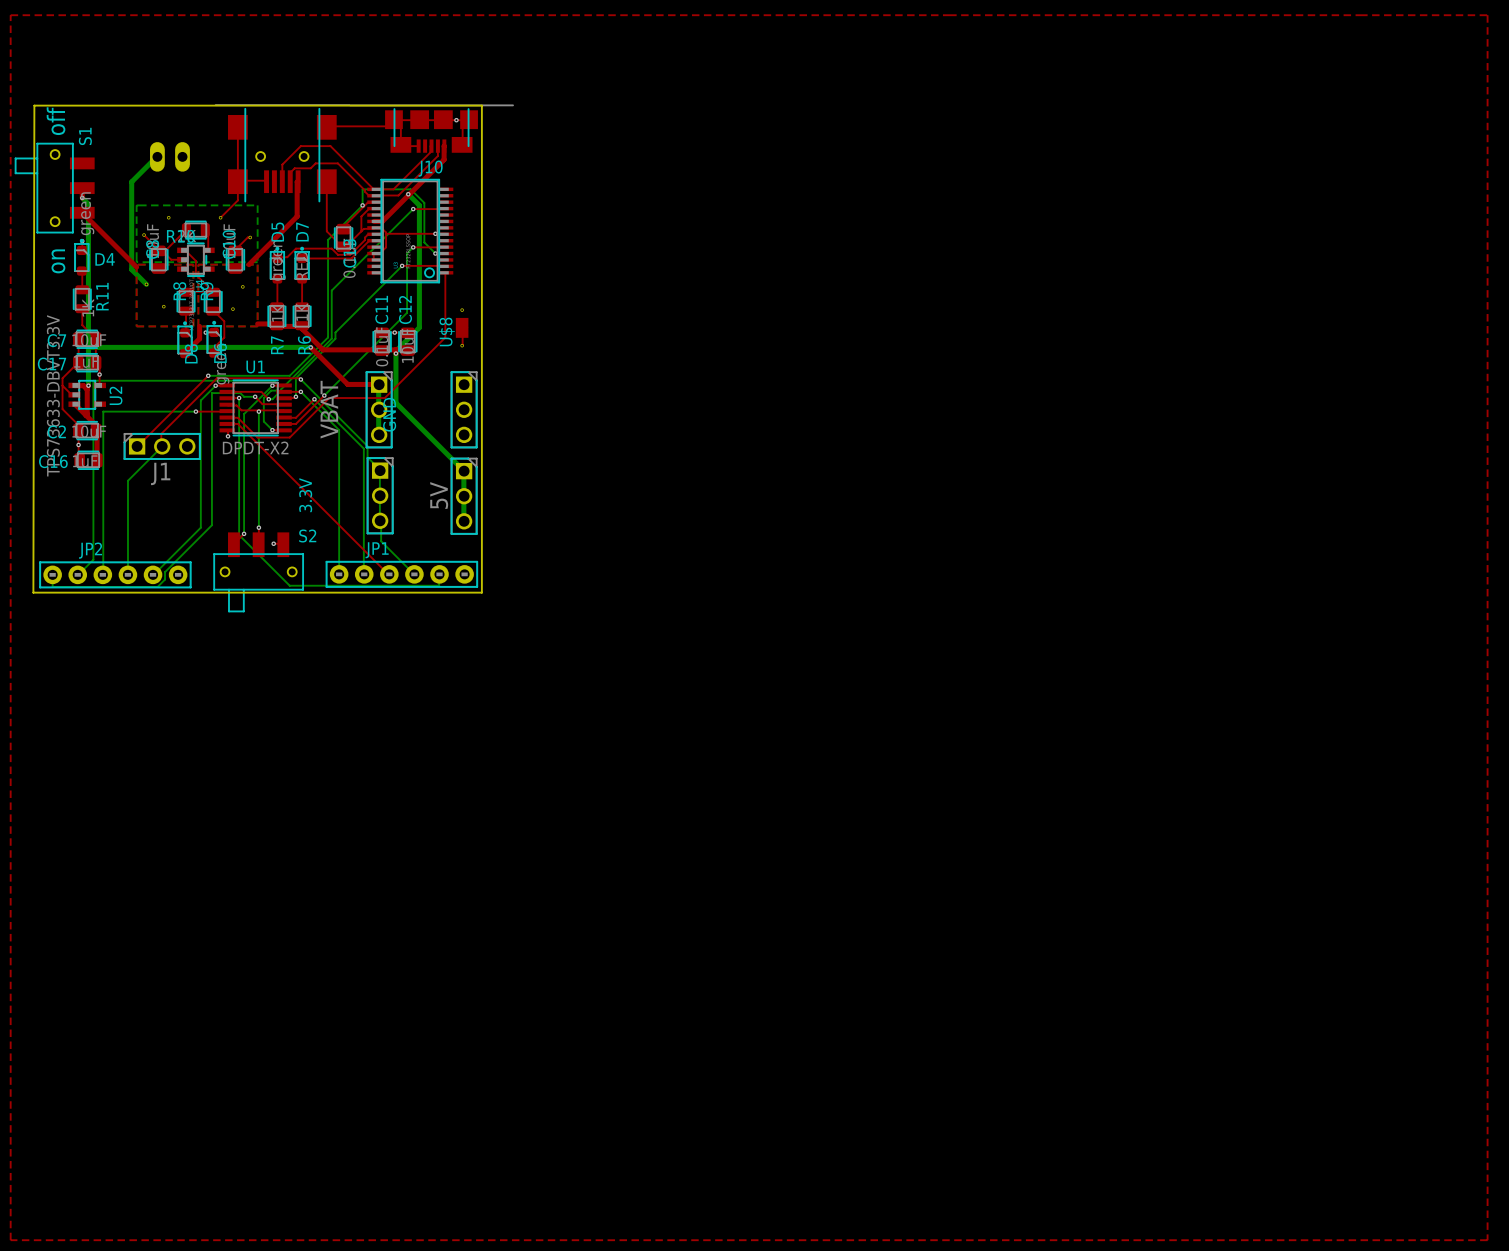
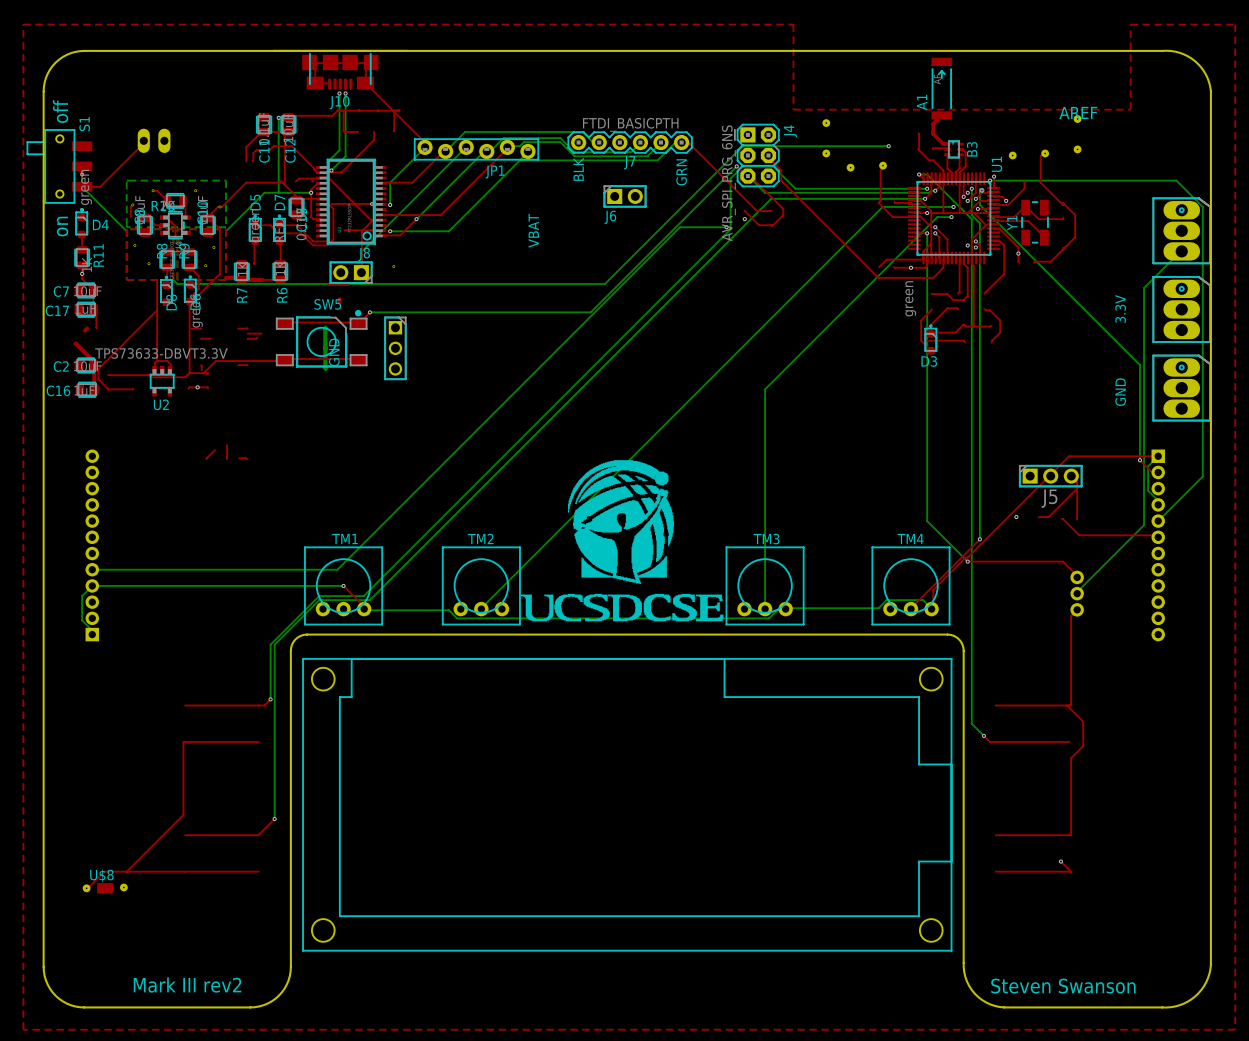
top zone outline: (949, 15) (1360, 15) -> (793, 24) (793, 109) (1130, 109) (1130, 24)
board edge: none -> (84, 50) (1166, 50) (1183, 54) (1194, 61) (1205, 74) (1210, 91) (1210, 964) (1208, 978) (1201, 989) (1188, 1001) (1166, 1007) (1004, 1007) (985, 1002) (971, 989) (965, 977) (963, 967) (963, 650) (961, 642) (953, 635) (307, 634) (295, 639) (290, 650) (290, 966) (288, 980) (284, 988) (271, 1001) (263, 1005) (250, 1007) (84, 1007) (70, 1005) (58, 998) (47, 984) (43, 966) (43, 91) (45, 78) (55, 62) (70, 53) (84, 50)
top track: none -> (329, 84) (315, 83) (315, 63) (309, 62) (371, 62) (365, 63) (365, 83) (424, 142) (425, 147)
A1: none -> (941, 88)
bottom track: none -> (339, 93) (339, 150) (327, 162)
via: none -> (339, 93)
bottom track: none -> (345, 93) (345, 156) (331, 170)
via: none -> (345, 93)
board edge: (34, 105) (33, 592) (481, 592) (481, 105) (34, 105) -> none
via: (456, 120) -> none
text: none -> AREF (1078, 112)
top track: none -> (941, 115) (933, 123) (932, 133) (943, 144) (947, 144)
top track: (237, 127) (237, 200) (220, 217) -> none
bottom track: none -> (278, 117) (278, 192)
via: none -> (278, 117)
J10 position: (431, 128) -> (340, 69)
part: none -> (1077, 119)
part: none -> (826, 123)
top track: (330, 146) (373, 189) (393, 189) (430, 152) (431, 146) -> (285, 131) (288, 131) (284, 131) (284, 184) (281, 181)
top track: (444, 146) (444, 159) (382, 221) (374, 221) -> none
top track: none -> (918, 133) (918, 149) (943, 170) (943, 213)
part: (282, 153) -> none
bottom track: (157, 156) (131, 181) (131, 269) (146, 284) -> none
bottom track: none -> (599, 142) (592, 142) (582, 131) (465, 131) (445, 151)
J7: none -> FTDI_BASICPTH (630, 142)
bottom track: none -> (640, 142) (631, 152) (574, 152) (560, 138) (503, 138) (491, 150) (485, 150) (416, 219)
bottom track: none -> (661, 142) (647, 156) (574, 156) (560, 142) (523, 142) (519, 146) (507, 147)
top track: none -> (681, 142) (681, 144) (690, 144) (756, 211) (771, 211)
bottom track: none -> (681, 142) (673, 144) (657, 160) (519, 160)
bottom track: none -> (888, 146) (742, 146) (604, 283) (177, 283) (173, 279)
via: none -> (888, 146)
bottom track: none -> (425, 147) (390, 182) (390, 204)
bottom track: none -> (466, 147) (361, 251) (361, 272)
top track: none -> (932, 149) (947, 149)
B3: none -> (953, 149)
top track: none -> (960, 149) (965, 152) (965, 166) (959, 172) (959, 213)
part: none -> (1077, 149)
bottom track: none -> (527, 151) (448, 231) (390, 231)
part: none -> (826, 153)
top track: none -> (1045, 153) (1040, 156) (1040, 181) (1075, 215) (1075, 237) (1050, 261) (1034, 262)
part: none -> (1045, 153)
top track: none -> (947, 154) (947, 168) (951, 172) (951, 178)
top track: none -> (960, 154) (959, 168) (955, 172) (955, 178)
J4: none -> AVR_SPI_PRG_6NS (756, 155)
top track: none -> (768, 155) (767, 156) (781, 170) (781, 180) (878, 277) (933, 277) (943, 267) (943, 257)
part: none -> (1012, 155)
top track: (237, 180) (266, 181) -> none
top track: (298, 181) (297, 216) (249, 264) -> none
top track: (326, 181) (326, 231) (342, 247) (346, 246) (363, 228) (381, 227) (386, 232) (386, 247) (379, 253) (373, 254) -> (311, 201) (311, 217) (313, 219) (321, 219) (321, 221)
top track: none -> (883, 165) (884, 166) (880, 170) (880, 200) (878, 202) (892, 217) (921, 217) (931, 227)
part: none -> (883, 165)
top track: none -> (736, 166) (746, 176) (748, 174) (783, 209) (783, 215) (773, 225) (759, 225) (744, 210)
bottom track: none -> (736, 166) (590, 312) (369, 312)
via: none -> (736, 166)
part: none -> (850, 167)
via: none -> (331, 170)
bottom track: (408, 194) (419, 205) (419, 327) (395, 351) (395, 402) (464, 471) (464, 521) -> none
via: (408, 194) -> none
bottom track: (82, 197) (88, 204) (88, 385) -> (82, 174) (82, 186) (126, 231)
top track: none -> (919, 174) (923, 178)
bottom track: none -> (919, 174) (927, 174) (971, 219) (971, 723) (983, 735)
via: none -> (919, 174)
bottom track: none -> (747, 176) (765, 192) (929, 192) (935, 190)
top track: none -> (994, 176) (993, 187)
via: none -> (994, 176)
top track: (367, 202) (344, 226) (343, 229) -> (316, 178) (298, 178) (295, 181)
top track: none -> (321, 177) (329, 178) (371, 221) (361, 231) (361, 272)
top track: none -> (931, 178) (931, 192) (925, 198)
top track: none -> (939, 178) (939, 186) (935, 190)
top track: none -> (964, 178) (963, 196)
top track: none -> (976, 178) (975, 192) (967, 200)
via: (362, 205) -> none
bottom track: none -> (990, 180) (1176, 180) (1202, 206) (1202, 476) (1158, 521)
via: none -> (990, 180)
top track: none -> (281, 181) (298, 198) (321, 199)
top track: none -> (281, 181) (246, 182) (219, 206)
top track: none -> (1025, 181) (1024, 188) (1008, 204) (993, 204)
top track: (446, 208) (413, 209) -> (380, 183) (412, 182) (445, 151)
bottom track: (413, 209) (331, 290) (331, 338) (272, 399) (268, 399) -> none
via: (413, 209) -> none
top track: (82, 212) (136, 267) -> (82, 186) (100, 186) (144, 142) (143, 140)
bottom track: none -> (927, 188) (795, 188) (773, 166) (742, 166) (730, 178) (730, 229) (363, 596) (319, 596) (270, 644) (270, 699)
via: none -> (927, 188)
bottom track: none -> (971, 188) (971, 215) (979, 223) (979, 539)
via: none -> (971, 188)
bottom track: none -> (979, 188) (979, 204) (1139, 365) (1139, 460)
via: none -> (935, 190)
top track: none -> (993, 191) (981, 192) (975, 198)
bottom track: none -> (311, 192) (264, 192) (226, 231)
via: none -> (311, 192)
via: none -> (967, 192)
J6: none -> (625, 196)
top track: none -> (993, 196) (1002, 196) (1006, 200)
via: none -> (963, 196)
bottom track: none -> (925, 198) (771, 198) (369, 600) (319, 600) (274, 644) (274, 818)
via: none -> (925, 198)
via: none -> (975, 198)
top track: none -> (914, 200) (921, 200) (931, 211) (931, 257)
top track: none -> (993, 200) (979, 200) (967, 213)
top track: (186, 230) (163, 252) -> (167, 200) (157, 190) (153, 190)
top track: none -> (894, 201) (910, 202) (915, 204) (914, 208)
via: none -> (967, 200)
via: none -> (1006, 200)
top track: (374, 234) (367, 235) (350, 254) (337, 254) (331, 248) (295, 248) (287, 257) (277, 258) -> (321, 204) (329, 204) (333, 209) (333, 239) (327, 245) (313, 245) (301, 233) (278, 233) (270, 225) (255, 224)
top track: (144, 235) (158, 249) -> (132, 204) (130, 206) (130, 217)
via: none -> (390, 204)
bottom track: none -> (953, 206) (882, 206) (481, 609)
via: none -> (953, 206)
top track: none -> (993, 208) (977, 209)
via: none -> (977, 209)
top track: (374, 240) (368, 241) (351, 258) (302, 258) -> (321, 209) (325, 209) (329, 213) (329, 239) (327, 241) (313, 241) (296, 225) (279, 224)
top track: none -> (914, 212) (927, 213)
top track: none -> (993, 212) (931, 213)
via: none -> (927, 213)
top track: none -> (973, 213) (985, 225) (971, 239) (973, 326)
bottom track: (413, 247) (407, 253) (407, 312) (324, 395) -> none
via: (413, 247) -> none
top track: (446, 247) (413, 247) -> (380, 214) (440, 215) (507, 147)
top track: none -> (993, 216) (1014, 217) (1026, 206) (1038, 219) (1062, 219) (1063, 217)
top track: none -> (207, 217) (219, 229) (219, 273) (189, 304) (189, 373)
bottom track: none -> (951, 217) (937, 217) (765, 389) (765, 609)
via: none -> (951, 217)
via: none -> (416, 219)
via: none -> (744, 219)
bottom track: (435, 253) (424, 242) (424, 202) (410, 189) (362, 189) (362, 205) (328, 239) (328, 337) (289, 375) (208, 375) -> none
via: (435, 253) -> none
top track: none -> (993, 220) (1028, 221) (1044, 237)
Y1: none -> (1035, 222)
bottom track: none -> (726, 227) (679, 227) (337, 569) (92, 569)
via: none -> (726, 227)
top track: none -> (935, 227) (947, 239) (947, 257)
via: none -> (935, 227)
top track: none -> (993, 228) (1000, 229) (1018, 247) (1019, 262)
D5 position: (277, 265) -> (255, 229)
D7 position: (302, 265) -> (279, 229)
bottom track: (402, 265) (335, 332) (335, 338) (295, 378) (295, 396) -> none
via: (402, 265) -> none
VBAT: none -> (1181, 230)
via: none -> (390, 231)
top track: none -> (914, 232) (927, 233)
bottom track: none -> (927, 233) (927, 521) (967, 561)
via: none -> (927, 233)
top track: none -> (935, 233) (939, 237) (939, 257)
via: none -> (935, 233)
top track: (446, 272) (445, 337) (384, 398) (329, 398) (289, 437) (257, 437) (237, 417) (227, 417) -> (380, 235) (400, 235) (416, 219)
top track: (277, 278) (276, 306) -> none
top track: none -> (255, 240) (253, 263)
top track: (302, 278) (302, 306) -> none
top track: none -> (279, 240) (280, 263)
top track: none -> (993, 240) (1000, 241) (1004, 245) (1004, 273) (984, 293)
top track: none -> (975, 241) (979, 245) (980, 257)
via: none -> (975, 241)
top track: none -> (931, 243) (923, 251) (923, 259) (886, 259) (879, 267)
via: none -> (967, 245)
via: none -> (975, 247)
bottom track: none -> (1181, 251) (1144, 288) (1144, 525) (1077, 593)
via: none -> (1018, 253)
top track: none -> (927, 257) (925, 267) (893, 267)
top track: none -> (960, 257) (959, 292) (958, 293)
top track: none -> (964, 257) (963, 263) (967, 267) (967, 296) (963, 300) (953, 300) (947, 294) (931, 293)
C11 name position: C11 (381, 309) -> C11 (264, 151)
C12 name position: C12 (405, 310) -> C12 (290, 151)
via: none -> (910, 267)
R6 position: (302, 316) -> (280, 271)
J8: none -> (351, 272)
via: none -> (82, 273)
top track: (302, 325) (302, 328) (323, 349) (407, 350) -> none
top track: none -> (280, 279) (262, 279)
top track: none -> (157, 279) (157, 360)
top track: (199, 326) (199, 338) (185, 353) -> none
U$8 rotation: 0° (462, 327) -> 90° clockwise (105, 888)
U$8 position: (462, 327) -> (105, 888)
via: (205, 332) -> none
via: (394, 332) -> none
top track: (462, 332) (462, 345) -> none
top track: (78, 339) (78, 362) (62, 378) (62, 409) (77, 423) (79, 460) -> none
C11 position: (382, 341) -> (264, 124)
C12 position: (407, 341) -> (288, 124)
part: (462, 345) -> none
bottom track: (88, 347) (310, 347) -> none
top track: (310, 347) (347, 384) (379, 384) -> none
via: (310, 347) -> none
via: (395, 353) -> none
top track: none -> (931, 309) (921, 320) (921, 340) (930, 350)
top track: none -> (958, 309) (947, 308) (925, 330) (925, 338) (927, 340) (963, 340) (965, 342)
top track: none -> (984, 309) (990, 310) (1000, 320) (1000, 332) (991, 342)
top track: none -> (157, 310) (98, 369) (98, 379) (108, 389) (132, 388)
top track: none -> (369, 312) (358, 323) (284, 323)
via: none -> (369, 312)
U1 name position: U1 (255, 367) -> U1 (996, 164)
via: (99, 374) -> none
top track: (208, 375) (137, 446) -> none
via: (208, 375) -> none
U1 footprint: [219, 379, 292, 437] -> [908, 172, 1000, 265]
top track: (300, 379) (216, 378) (161, 433) (162, 446) -> none
bottom track: (300, 379) (367, 446) (367, 457) (380, 470) (381, 541) (414, 574) -> none
via: (300, 379) -> none
top track: none -> (991, 325) (965, 326) (963, 324) (955, 332) (930, 333)
top track: (62, 385) (71, 394) (74, 394) -> none
top track: (74, 385) (83, 385) (87, 389) (86, 415) -> none
via: (88, 385) -> none
bottom track: (215, 385) (200, 400) (200, 527) (153, 574) -> none
via: (215, 385) -> none
bottom track: (272, 385) (244, 414) (244, 533) -> none
via: (272, 385) -> none
top track: (227, 391) (261, 391) (268, 399) -> none
bottom track: (300, 391) (339, 430) (339, 574) -> none
via: (300, 391) -> none
U2 rotation: 0° (87, 394) -> 90° clockwise (162, 381)
U2 position: (87, 394) -> (162, 381)
top track: (324, 395) (295, 423) (284, 423) -> none
via: (324, 395) -> none
top track: (255, 396) (262, 404) (284, 404) -> none
bottom track: (255, 396) (244, 396) (240, 393) (211, 393) (211, 525) (165, 572) (165, 579) (157, 586) (52, 586) (52, 574) -> none
via: (255, 396) -> none
via: (295, 396) -> none
SW5: none -> (321, 338)
bottom track: (239, 398) (239, 535) (289, 585) (439, 585) (439, 574) -> none
via: (239, 398) -> none
via: (268, 399) -> none
top track: (314, 399) (295, 417) (284, 417) -> none
bottom track: (314, 399) (363, 448) (364, 574) -> none
via: (314, 399) -> none
D3: none -> green (930, 339)
top track: (227, 404) (236, 405) (241, 410) (284, 411) -> none
VBAT: (379, 409) -> none
bottom track: (195, 411) (103, 411) (102, 574) -> none
via: (195, 411) -> none
top track: (227, 411) (195, 411) -> none
bottom track: (258, 411) (258, 527) -> none
via: (258, 411) -> none
top track: (227, 423) (237, 423) (389, 574) -> none
top track: none -> (358, 360) (284, 358) (284, 360) (215, 360) (203, 373) (207, 374) (189, 373)
top track: none -> (157, 360) (167, 360) (171, 365) (169, 370)
top track: none -> (157, 360) (154, 370)
bottom track: (272, 430) (263, 421) (263, 398) (271, 390) (277, 390) (277, 384) (273, 380) (93, 380) (93, 559) (77, 574) -> none
via: (272, 430) -> none
via: (228, 436) -> none
top track: none -> (189, 373) (185, 377) (108, 375)
via: (78, 444) -> none
bottom track: (162, 446) (127, 480) (127, 574) -> none
J1: (162, 446) -> none
U1 value: DPDT-X2 (255, 447) -> none
via: none -> (197, 387)
3.3V footprint: [367, 457, 394, 534] -> [1152, 276, 1211, 343]
top track: none -> (188, 388) (207, 388)
GND: none -> (1181, 388)
5V: (464, 496) -> none
via: (258, 527) -> none
via: (244, 533) -> none
top track: none -> (1158, 456) (1069, 456) (933, 589) (933, 608) (931, 609)
bottom track: none -> (1158, 456) (1148, 466) (1148, 490) (1158, 500) (1158, 504)
via: (273, 543) -> none
drawing: none -> [520, 460, 724, 622]
top track: none -> (1139, 460) (1152, 472) (1158, 472)
via: none -> (1139, 460)
JP1 name position: JP1 (377, 550) -> JP1 (495, 172)
JP1 footprint: [325, 560, 479, 588] -> [413, 138, 540, 161]
J5: none -> (1050, 476)
top track: none -> (1071, 476) (1077, 482) (1077, 519)
S2: (258, 572) -> none
JP2: (115, 574) -> none
top track: none -> (1077, 488) (1048, 517) (1038, 517)
via: none -> (1016, 517)
top track: none -> (1061, 519) (1079, 535) (1156, 535) (1158, 537)
top track: none -> (979, 539) (910, 609)
via: none -> (979, 539)
part: none -> (92, 545)
part: none -> (1158, 545)
top track: none -> (967, 561) (1062, 561) (1077, 577)
via: none -> (967, 561)
top track: none -> (343, 585) (365, 608) (364, 609)
bottom track: none -> (343, 585) (92, 585) (82, 596) (82, 620) (92, 630) (92, 634)
TM1: none -> (343, 585)
via: none -> (343, 585)
TM2: none -> (481, 585)
TM3: none -> (765, 585)
TM4: none -> (910, 585)
part: none -> (1077, 593)
bottom track: none -> (364, 609) (448, 610) (457, 618) (769, 618) (777, 610) (785, 610) (787, 608) (878, 608) (886, 600) (923, 600) (931, 609)
top track: none -> (1077, 609) (1071, 616) (1071, 705) (995, 705)
top track: none -> (270, 699) (264, 705) (185, 705)
via: none -> (270, 699)
top track: none -> (1067, 705) (1083, 721) (1083, 746) (1071, 758) (1071, 835) (995, 835)
top track: none -> (983, 735) (990, 741) (1069, 741)
via: none -> (983, 735)
top track: none -> (258, 741) (183, 741) (183, 814) (126, 871)
part: none -> (627, 804)
top track: none -> (274, 818) (258, 835)
via: none -> (274, 818)
top track: none -> (185, 835) (258, 835)
top track: none -> (1060, 861) (1071, 871) (995, 871)
via: none -> (1060, 861)
top track: none -> (258, 871) (104, 871) (86, 888)
part: none -> (123, 887)
part: none -> (86, 888)
text: none -> Mark III rev2 (187, 984)
text: none -> Steven Swanson (1063, 986)

